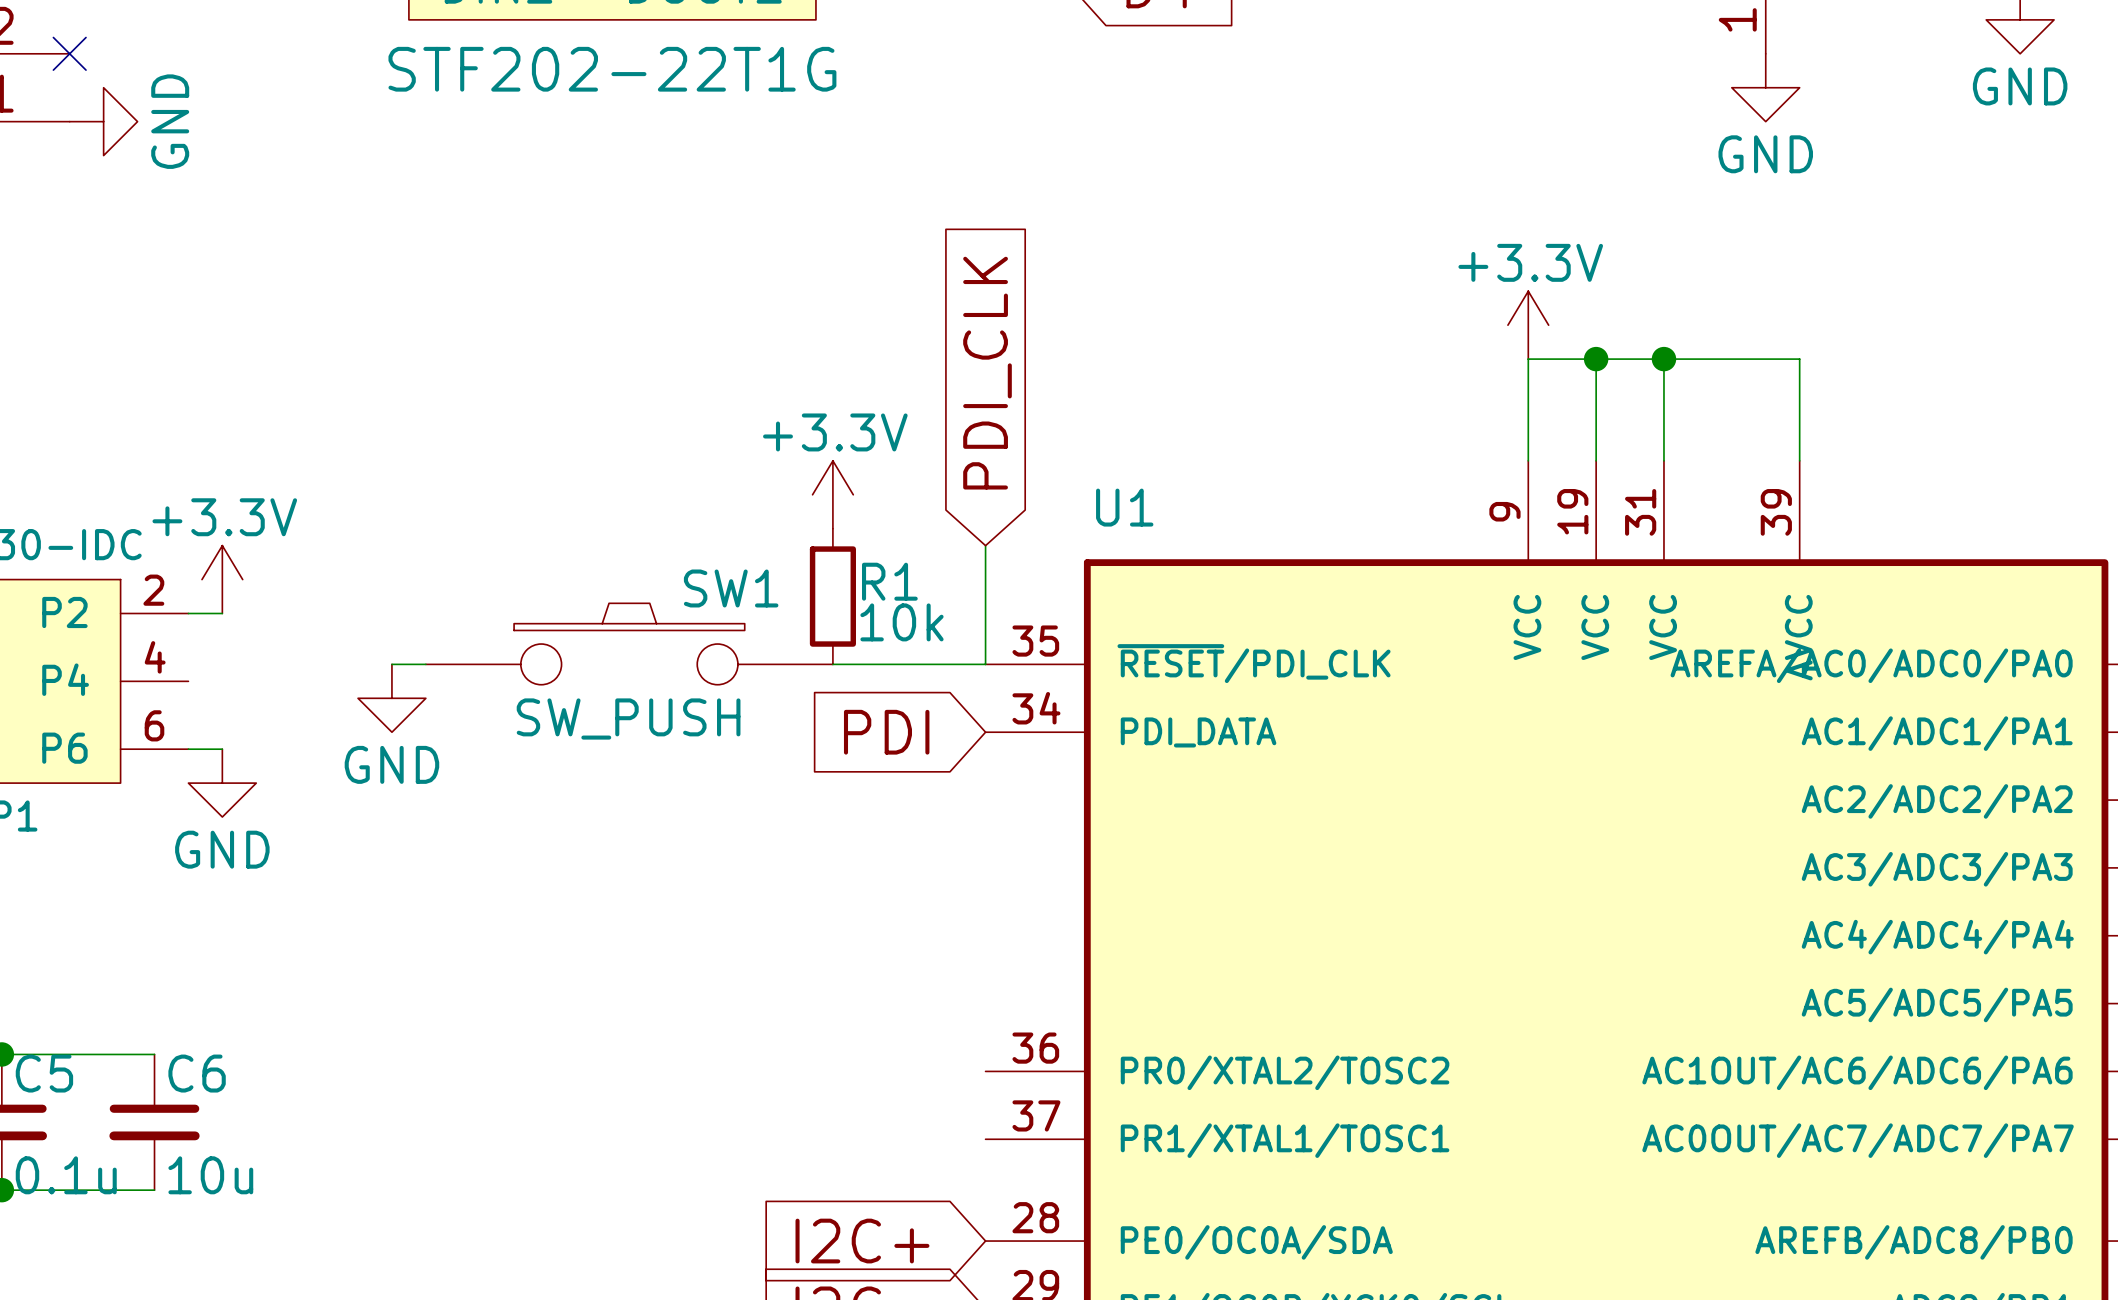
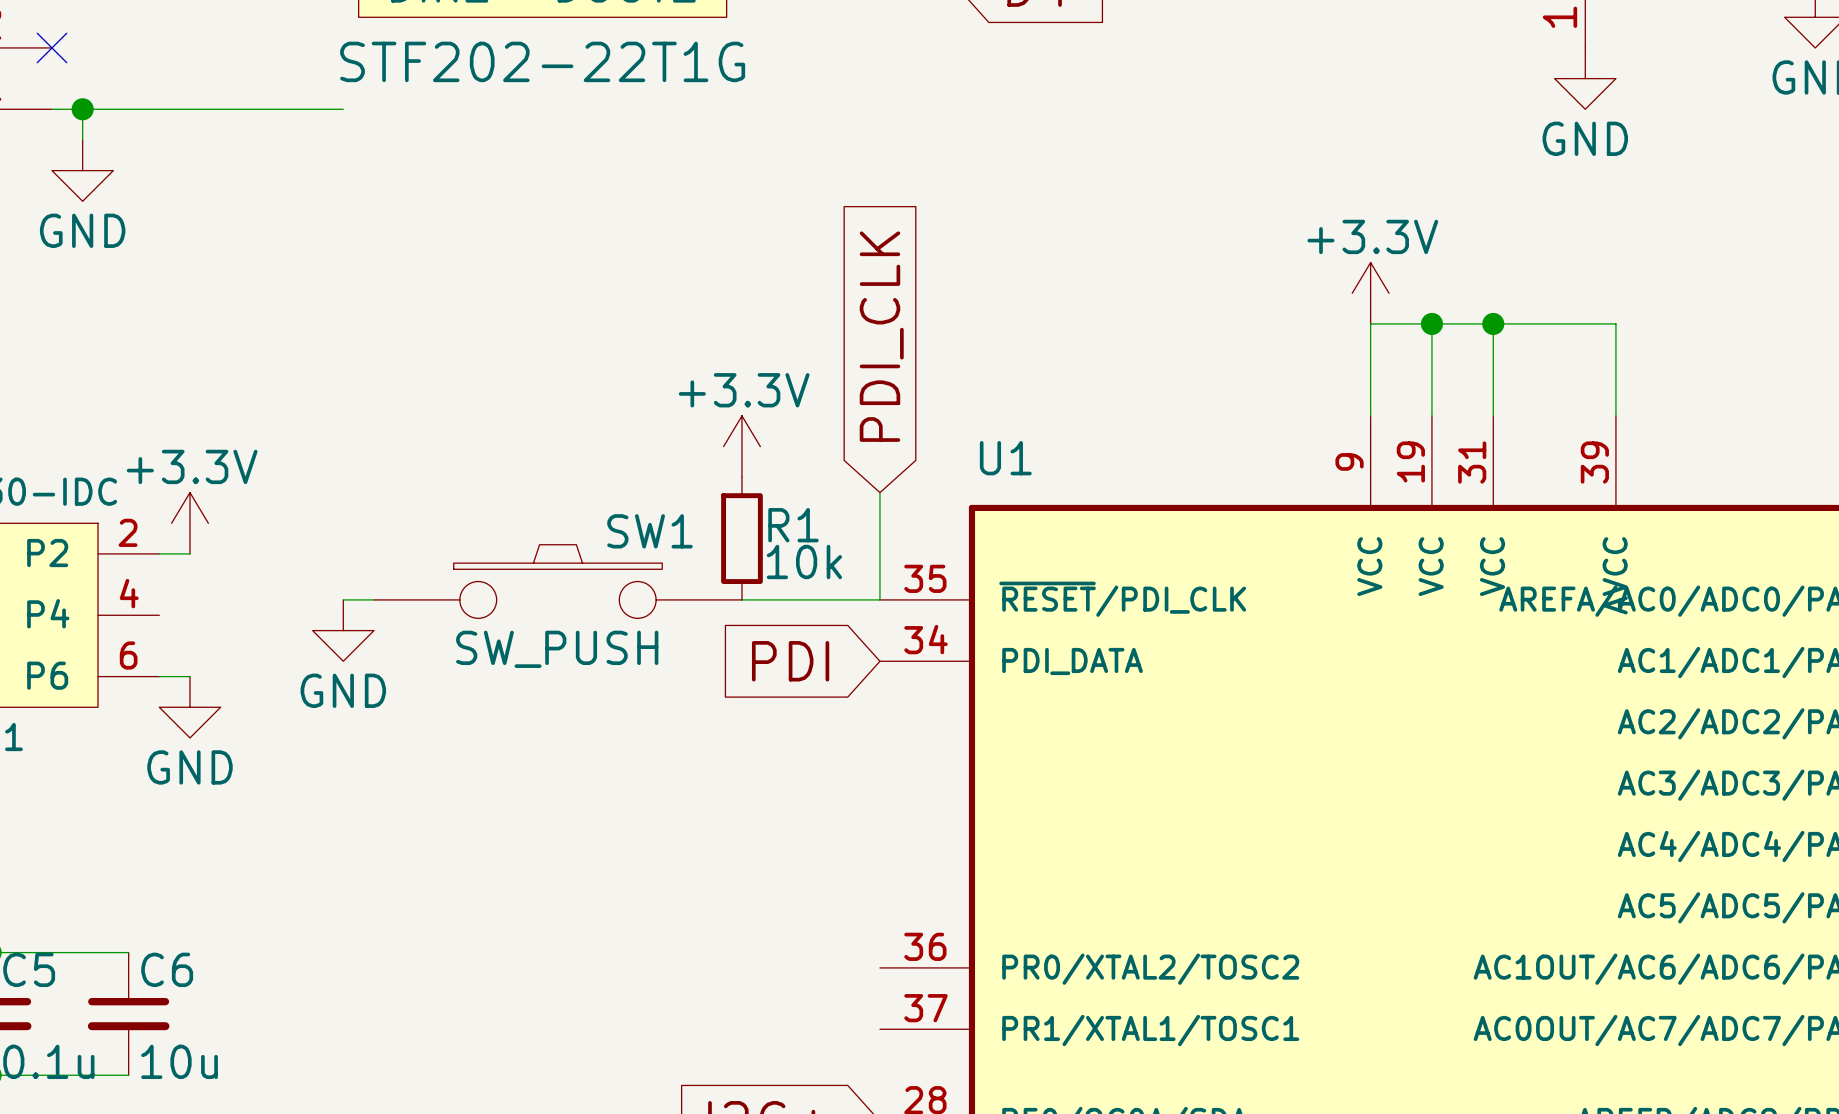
wire: none -> (51, 109) (343, 109)
power symbol rotation: 0° (103, 121) -> 90° clockwise (82, 170)
power symbol position: GND (103, 121) -> GND (82, 170)
junction: none -> (82, 109)

